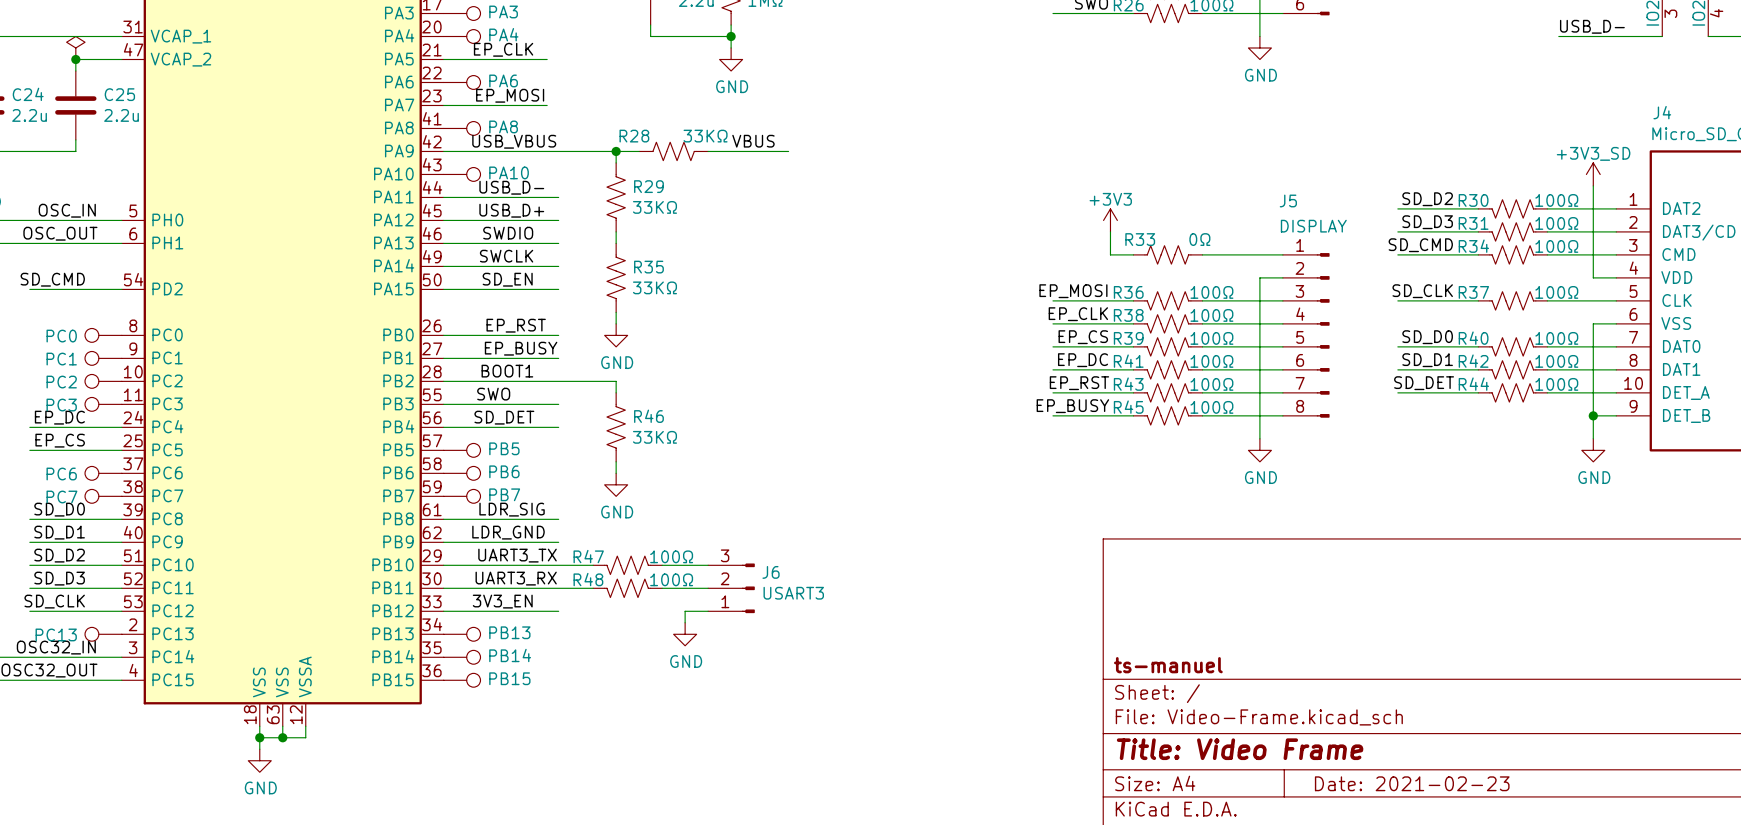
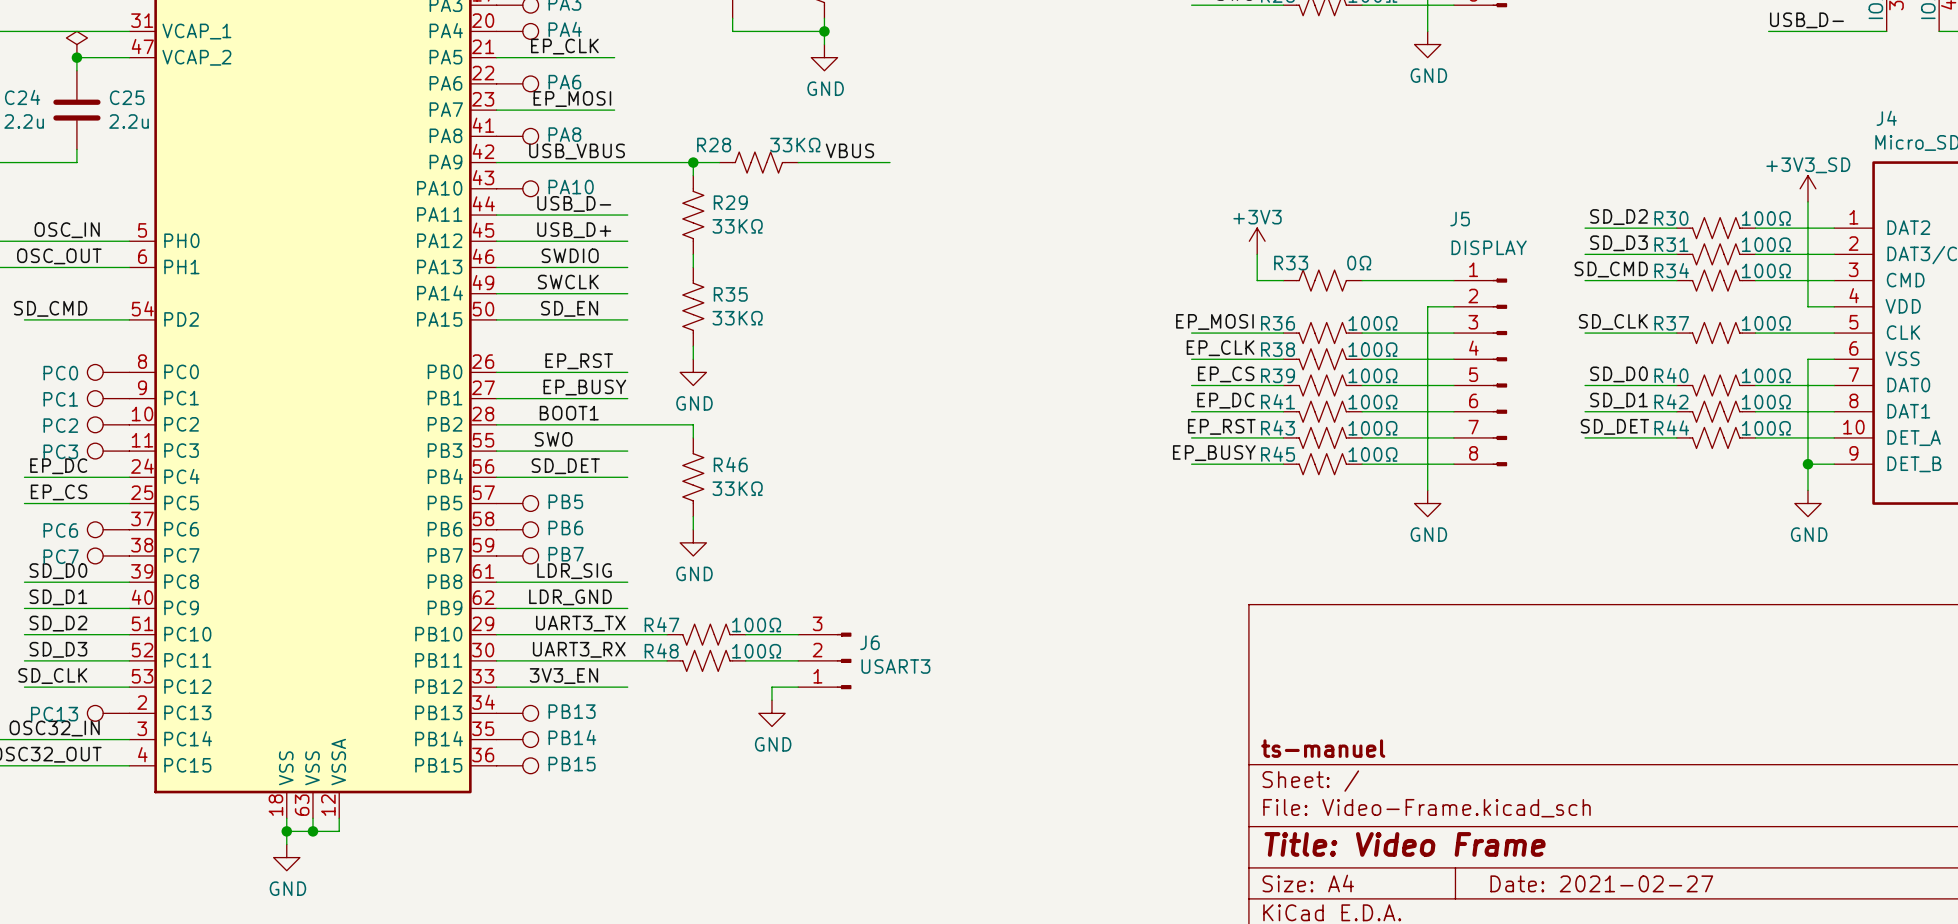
title block: Date: 2021-02-23 (1412, 783) -> Date: 2021-02-27 (1601, 883)

